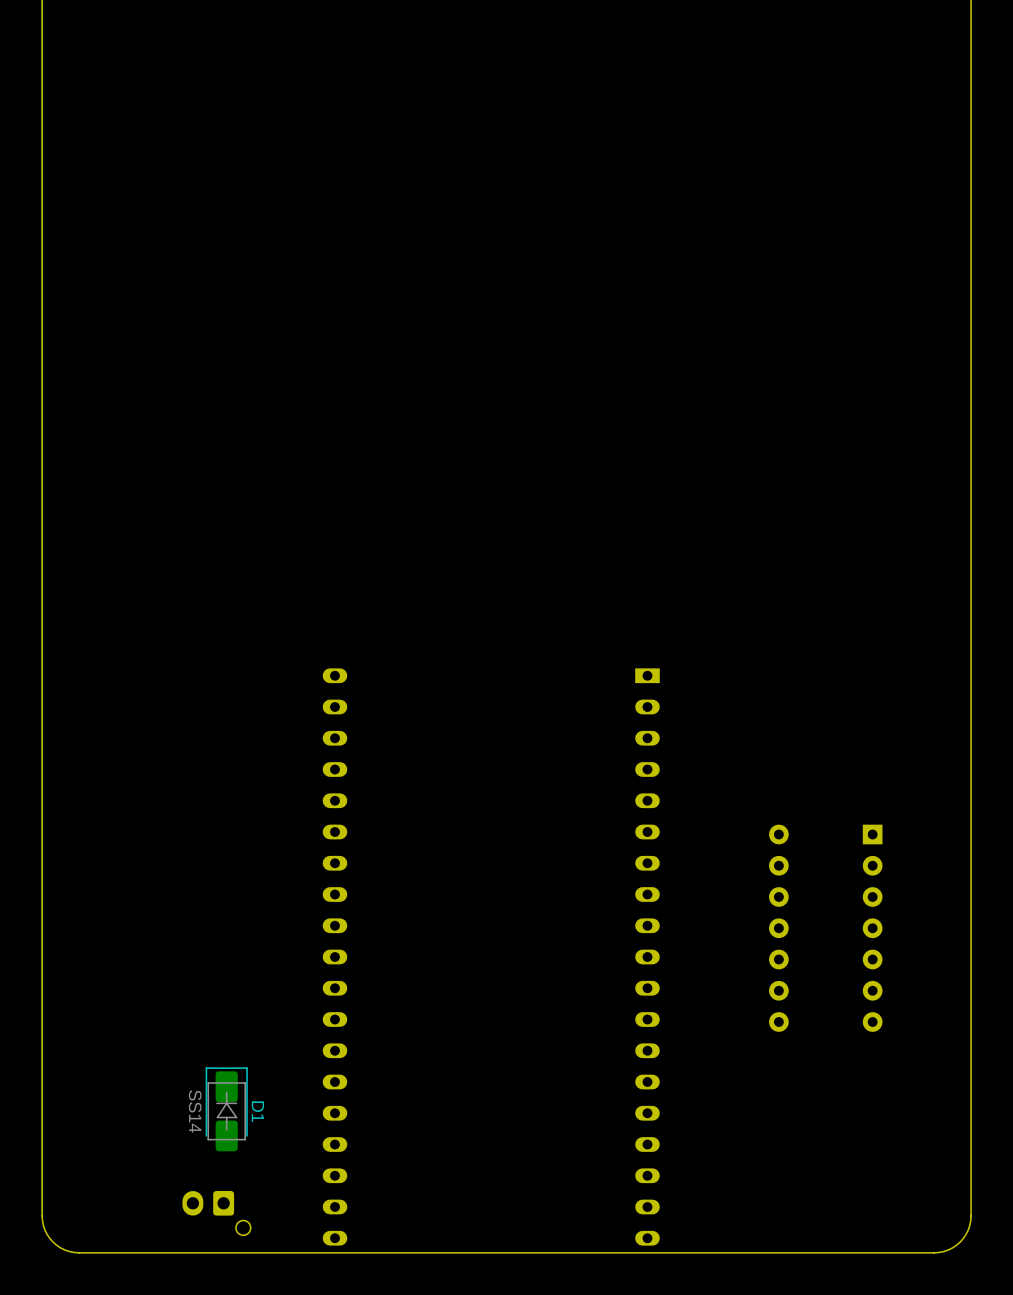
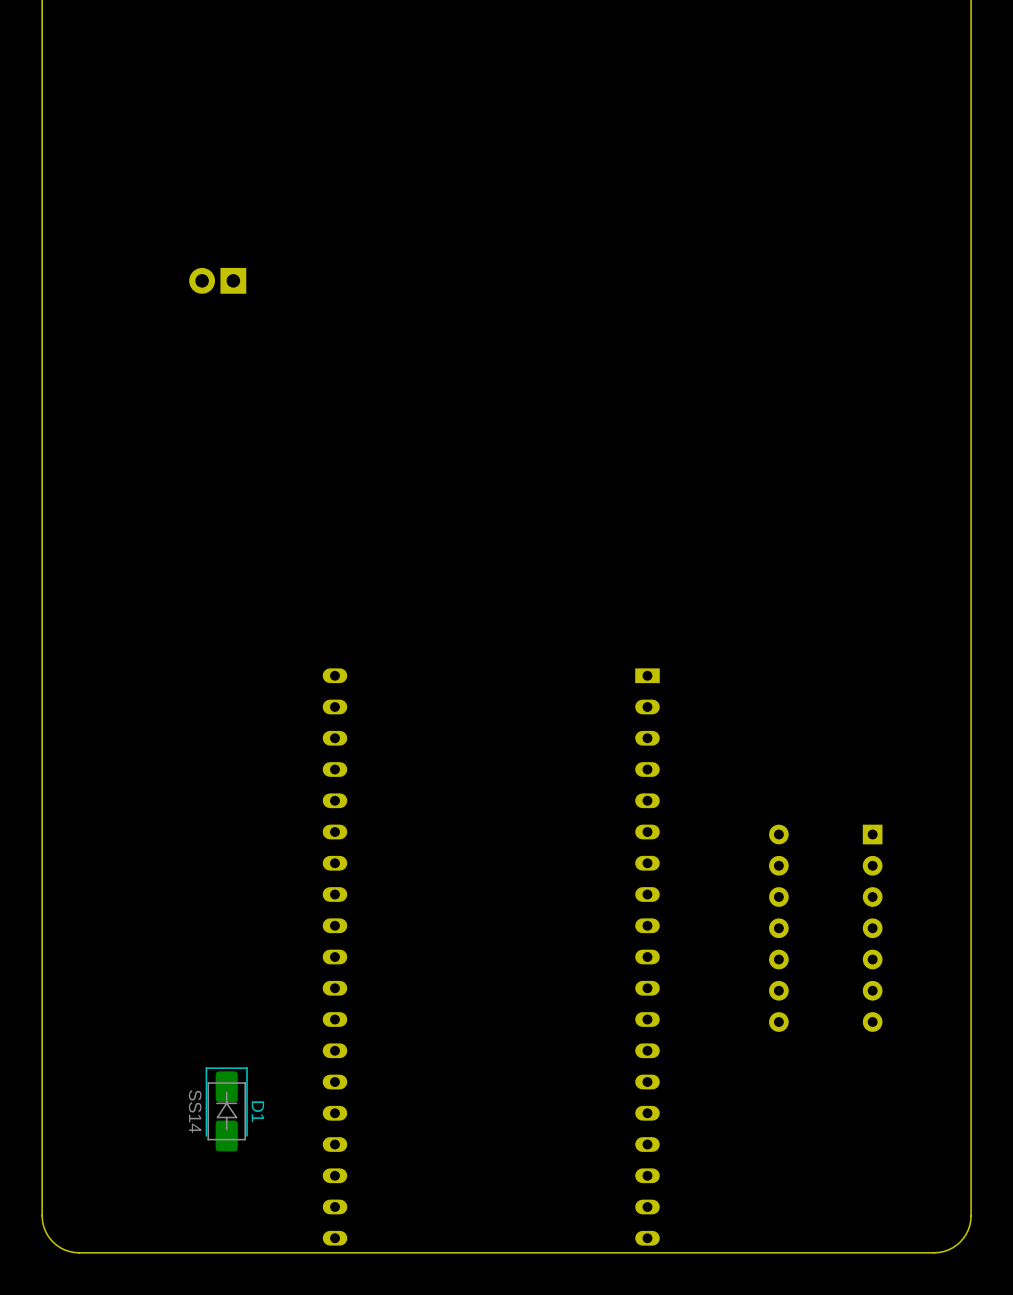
part: none -> (217, 280)
part: (216, 1213) -> none

